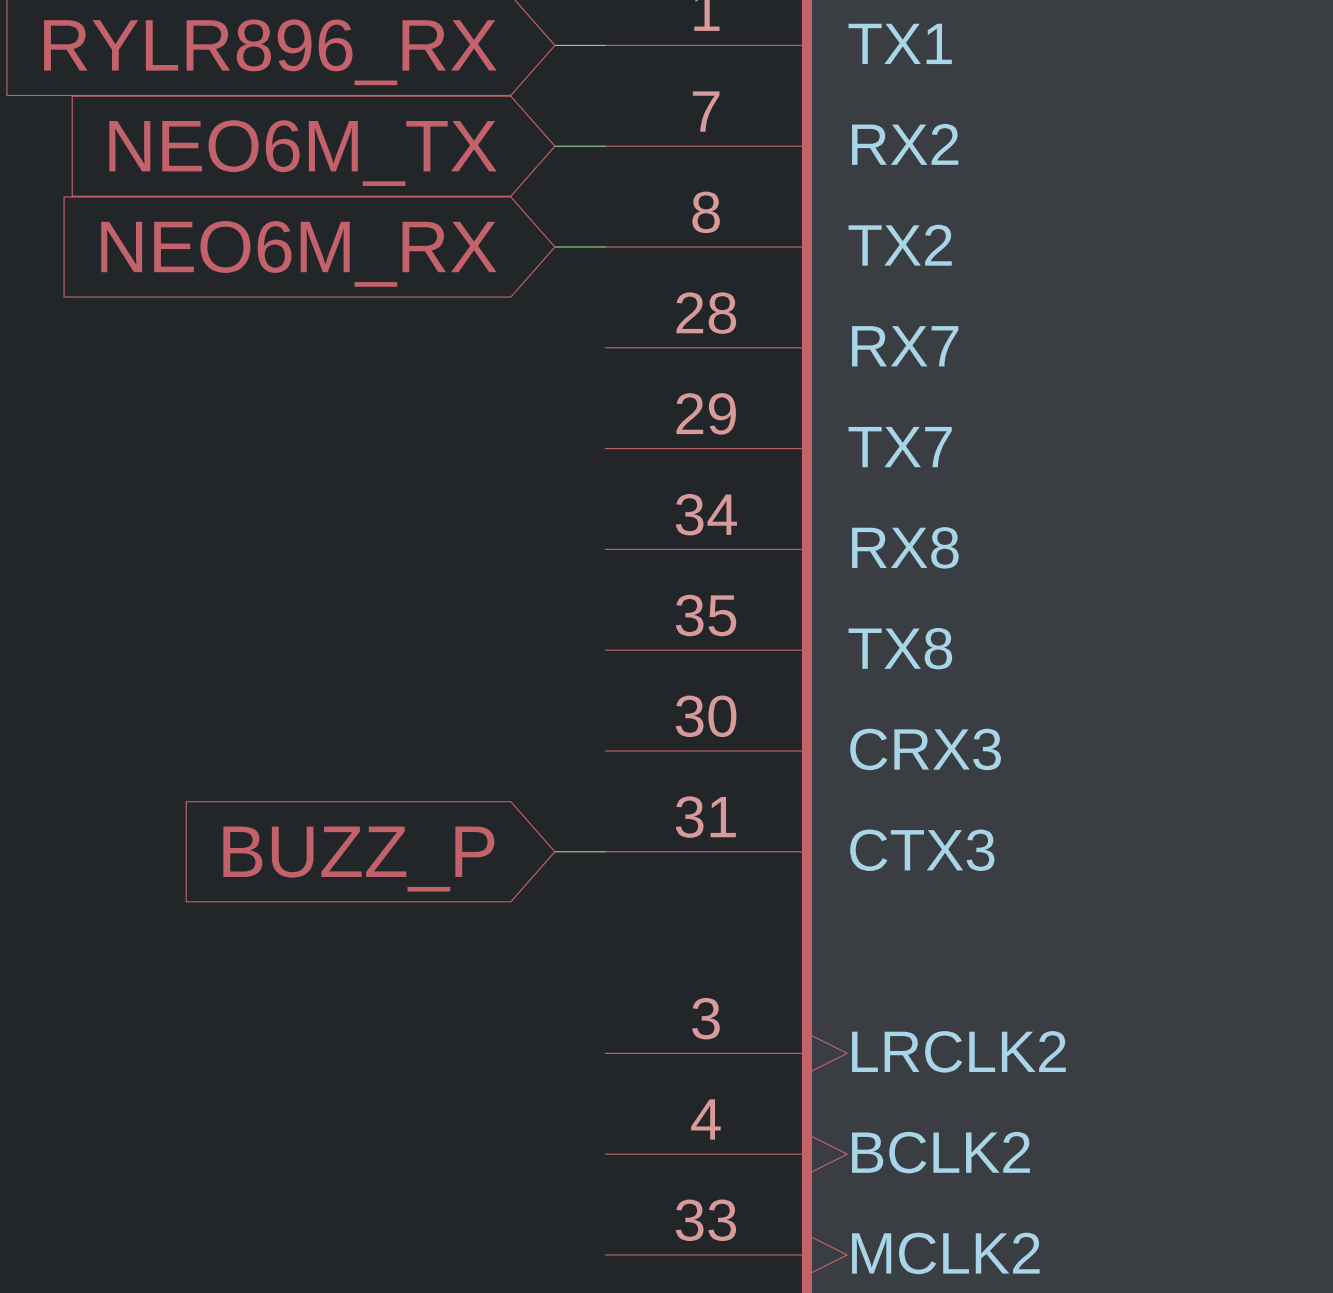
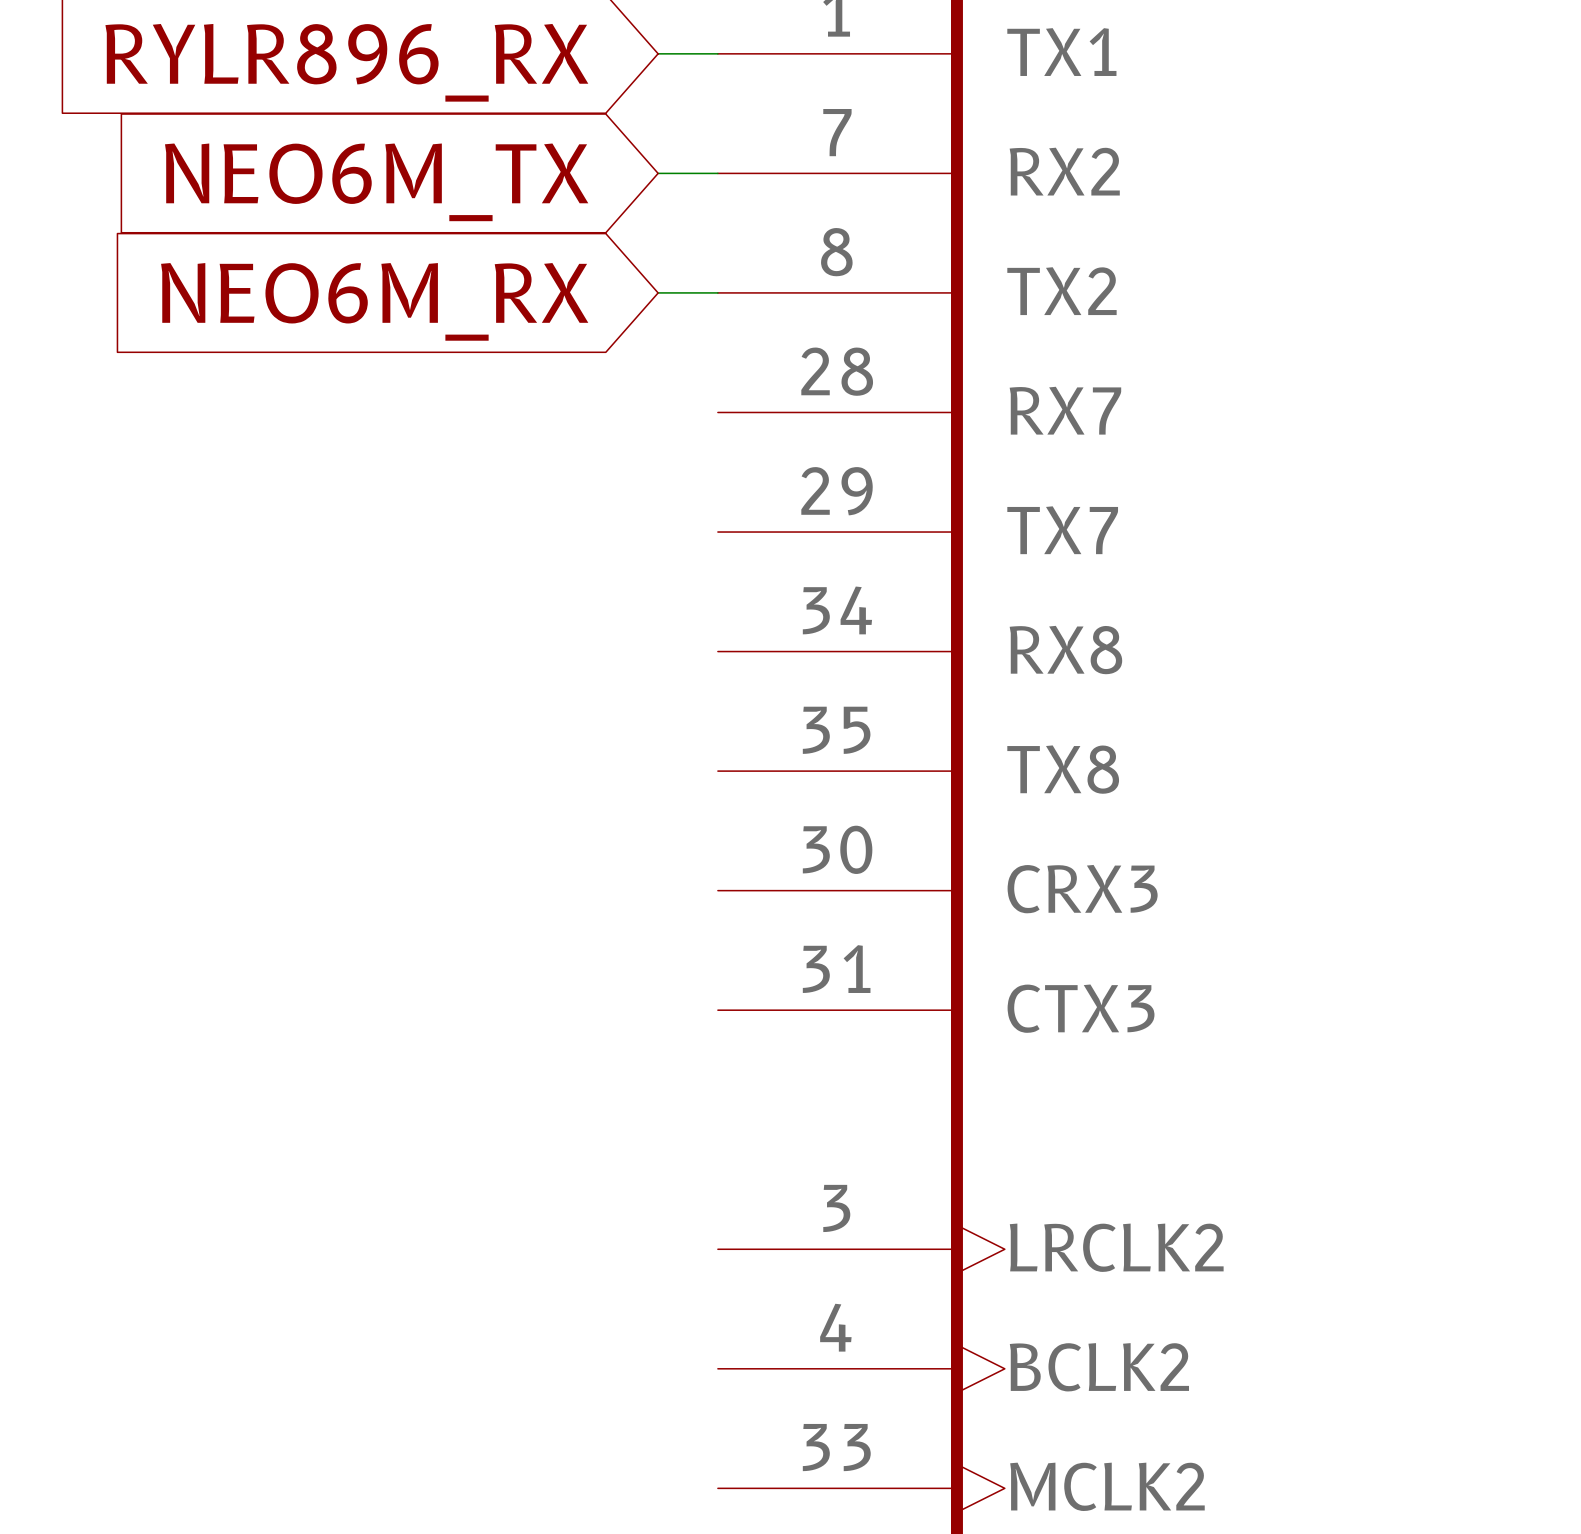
wire: (554, 851) (605, 851) -> none
global label: BUZZ_P (358, 859) -> none

